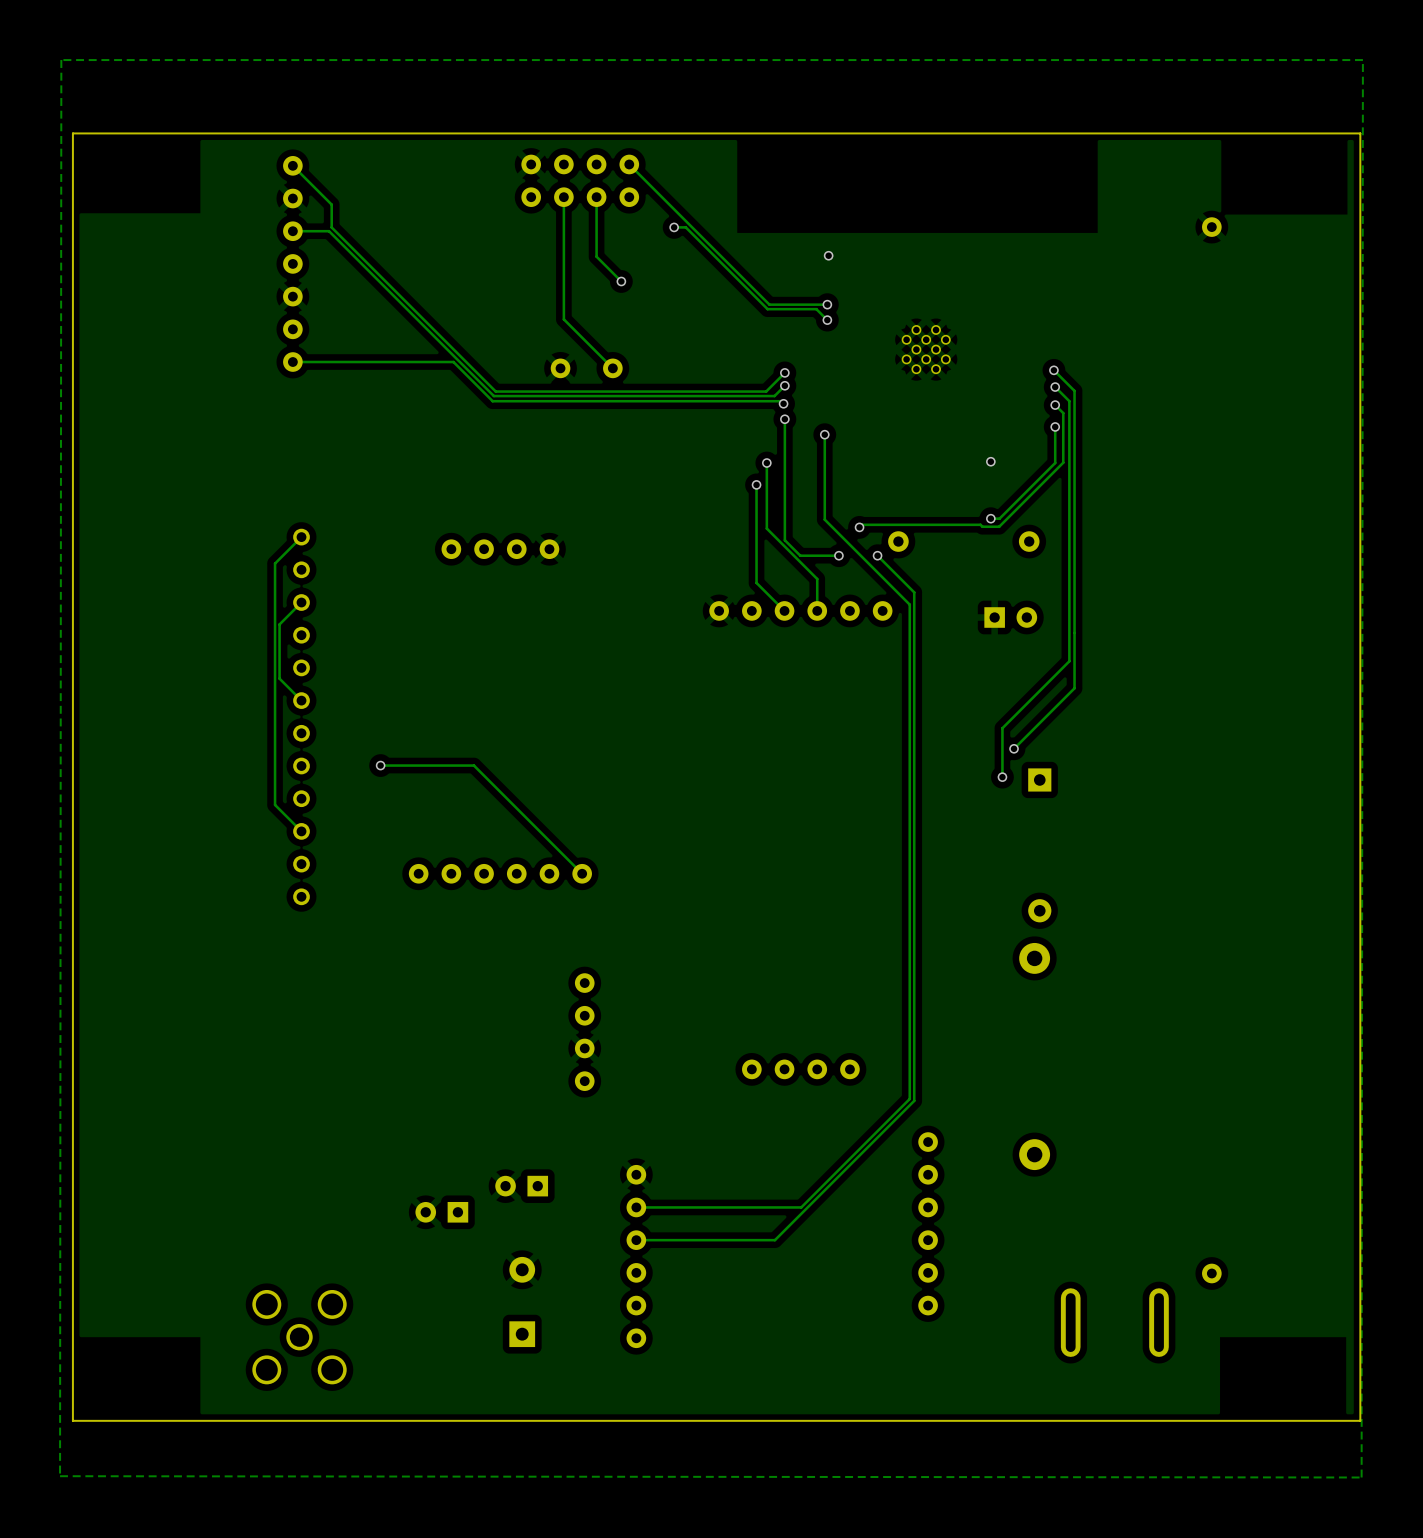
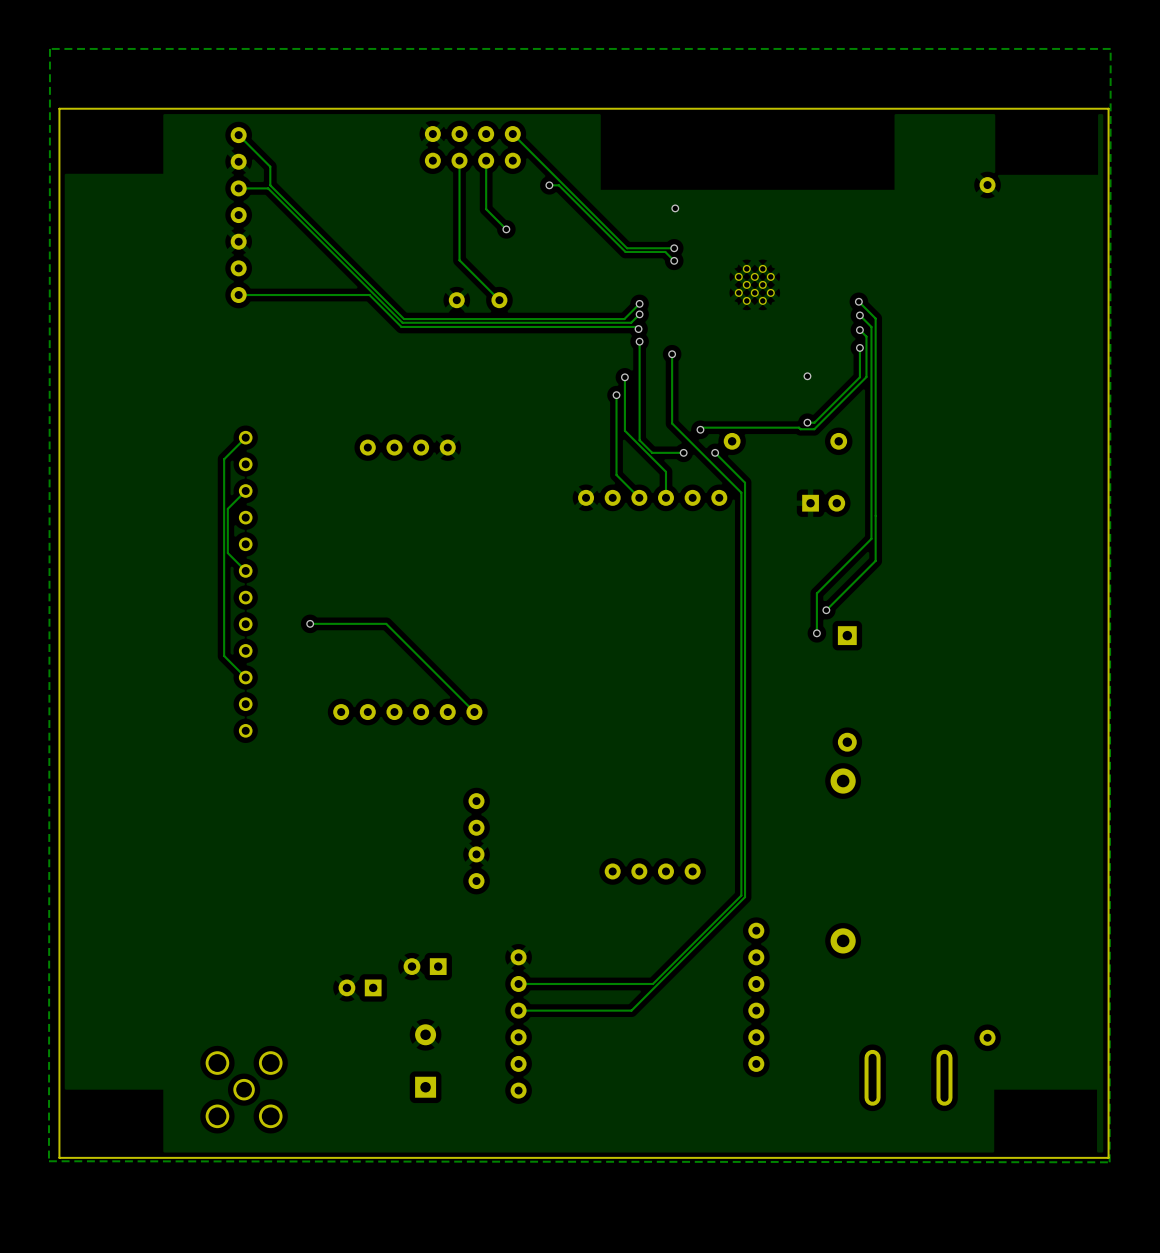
zone outline: (1362, 60) (1361, 1477) (60, 1476) (60, 1424) -> (1110, 48) (1109, 1162) (48, 1161)

